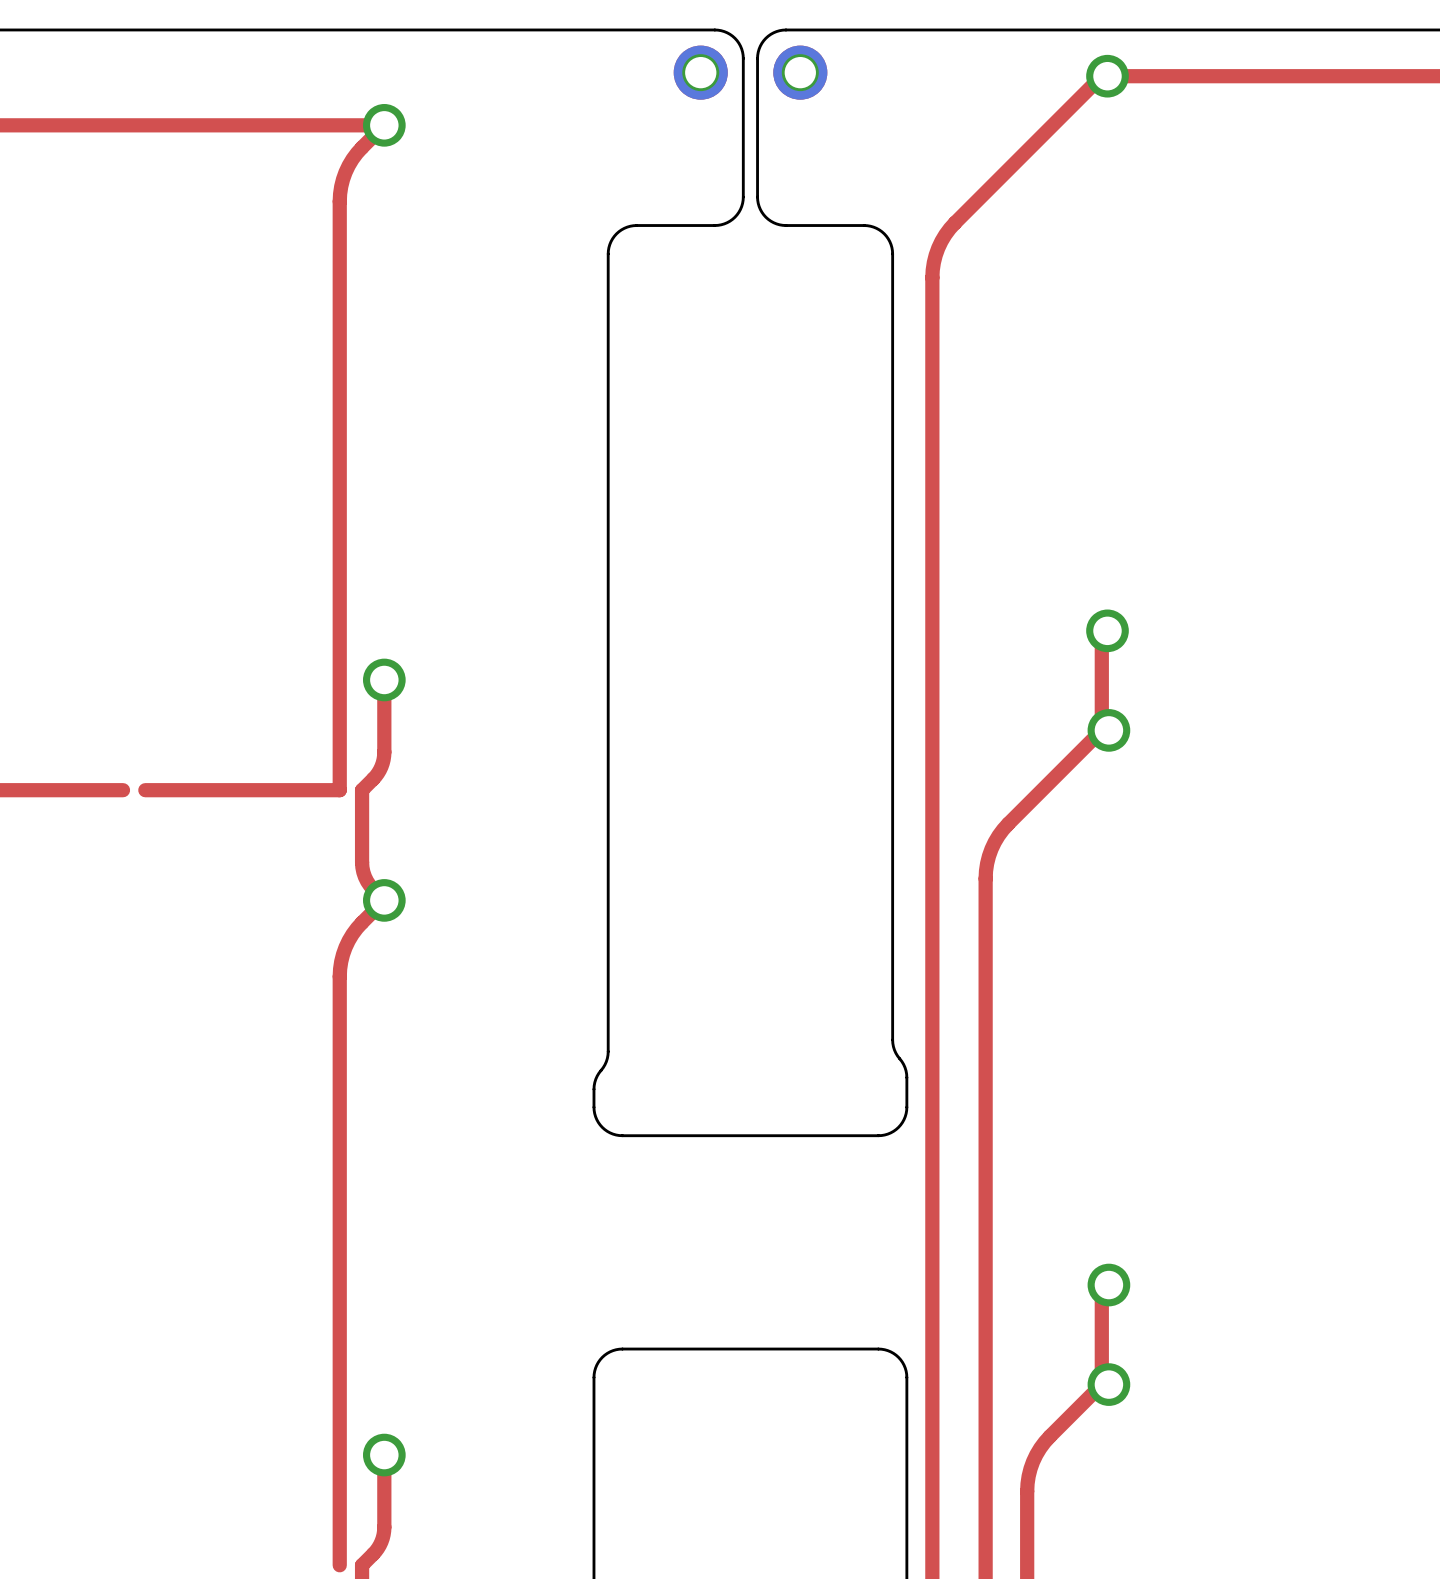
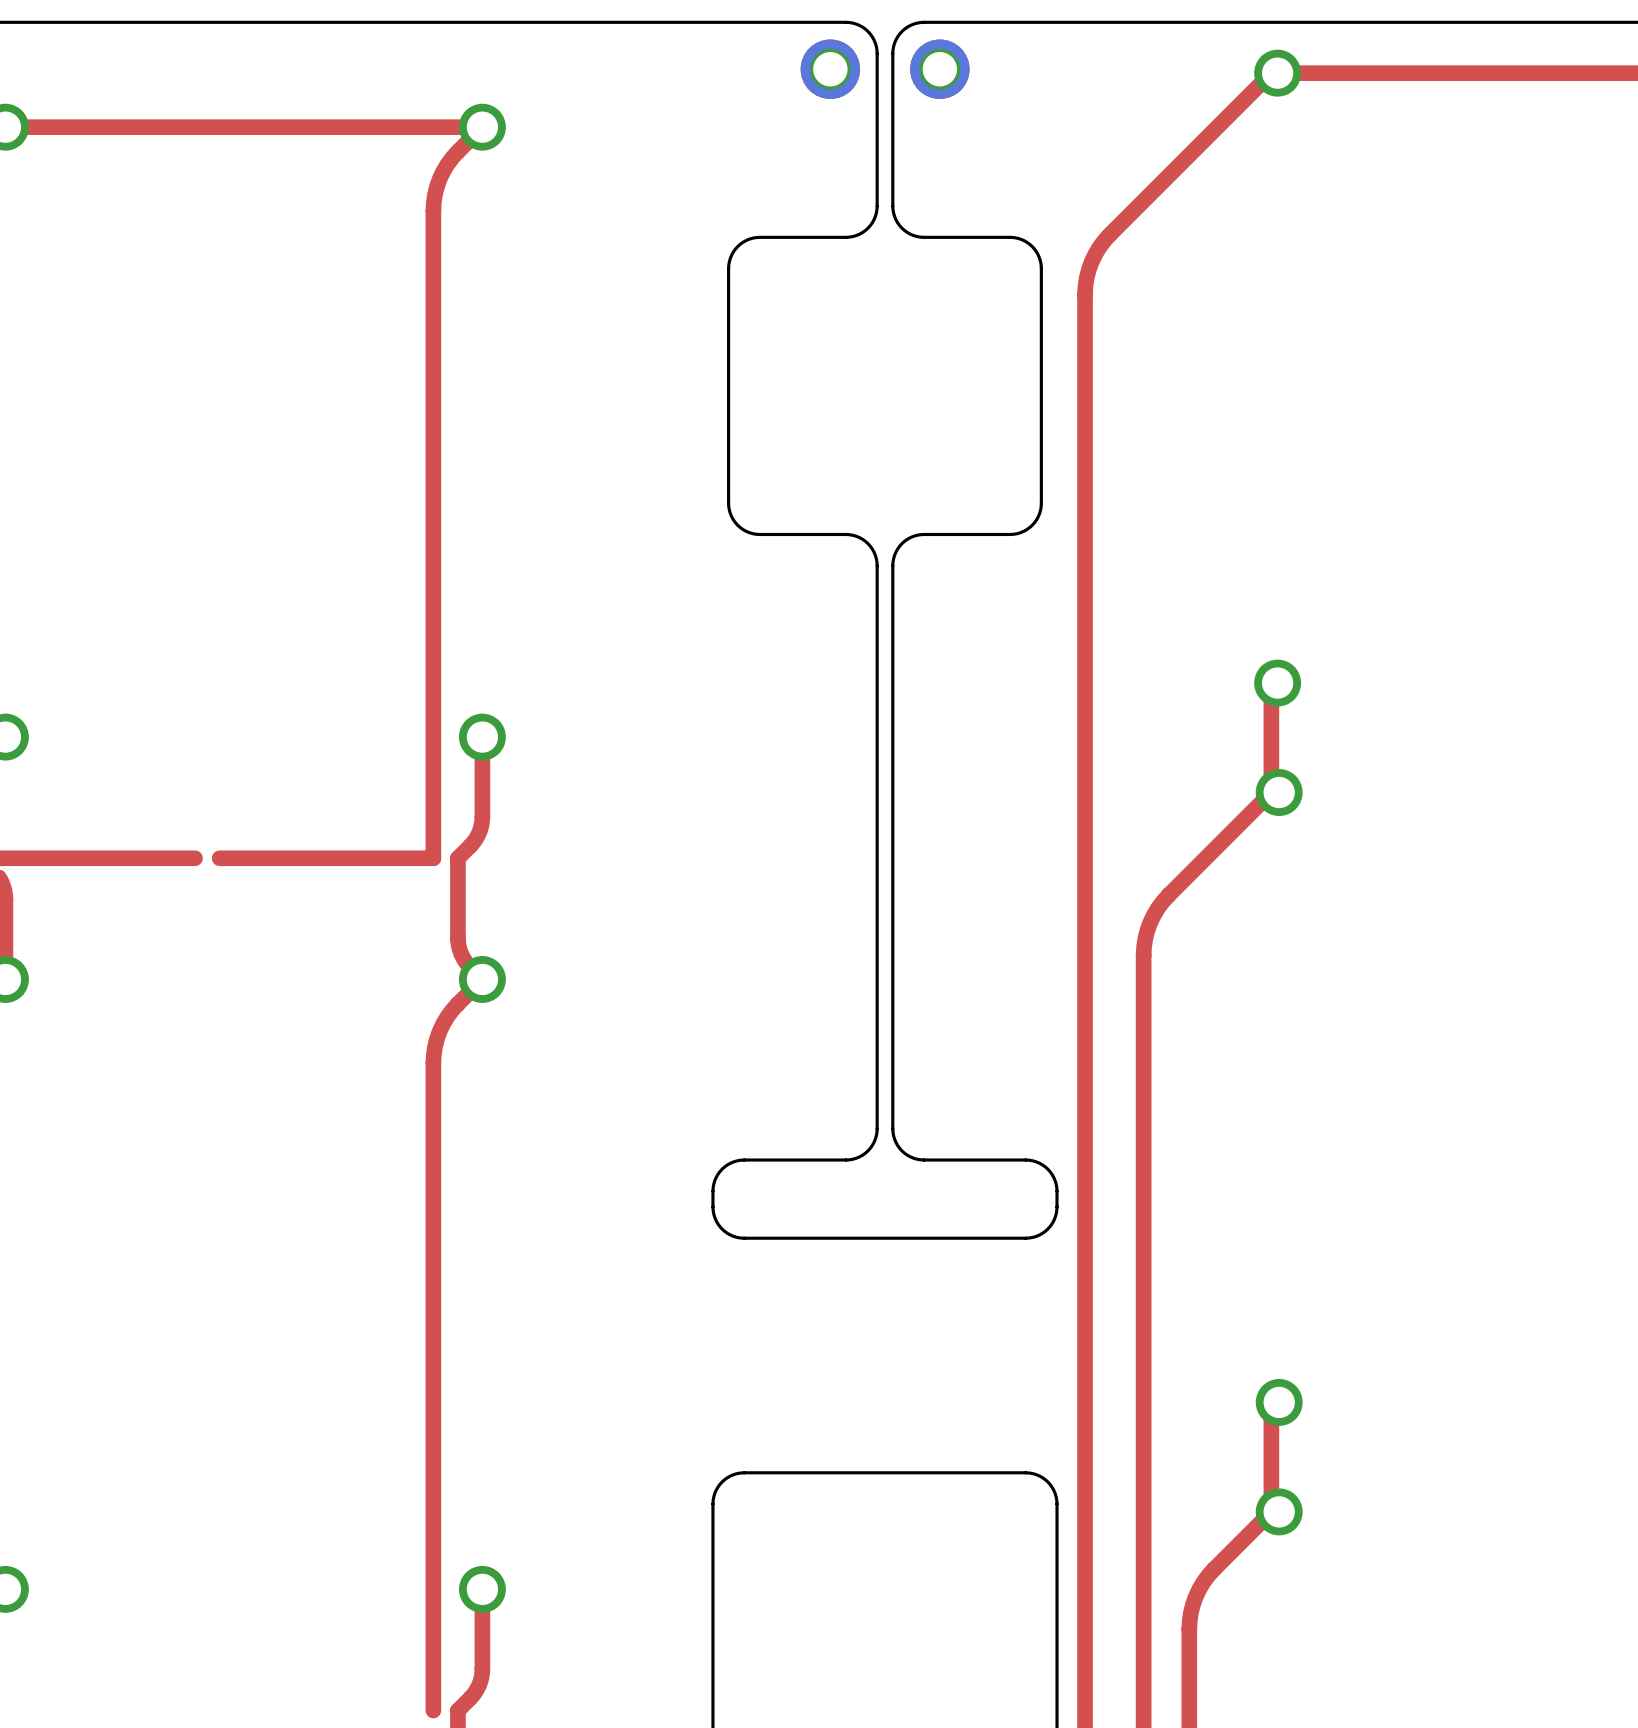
board edge: (608, 467) (608, 1051) (604, 1064) (595, 1079) (593, 1093) -> (728, 503) (733, 519) (740, 527) (749, 532) (759, 534) (852, 535) (868, 543) (876, 558) (877, 1128) (875, 1139) (870, 1148) (862, 1155) (852, 1159) (744, 1160) (733, 1161) (719, 1171) (714, 1180) (712, 1191)
board edge: (892, 467) (892, 1039) (894, 1050) (906, 1070) (906, 1093) -> (1041, 503) (1036, 519) (1029, 527) (1020, 532) (1010, 534) (917, 535) (901, 543) (893, 558) (892, 1128) (894, 1139) (899, 1148) (913, 1158) (924, 1160) (1032, 1160) (1042, 1164) (1050, 1171) (1055, 1180) (1057, 1191)

